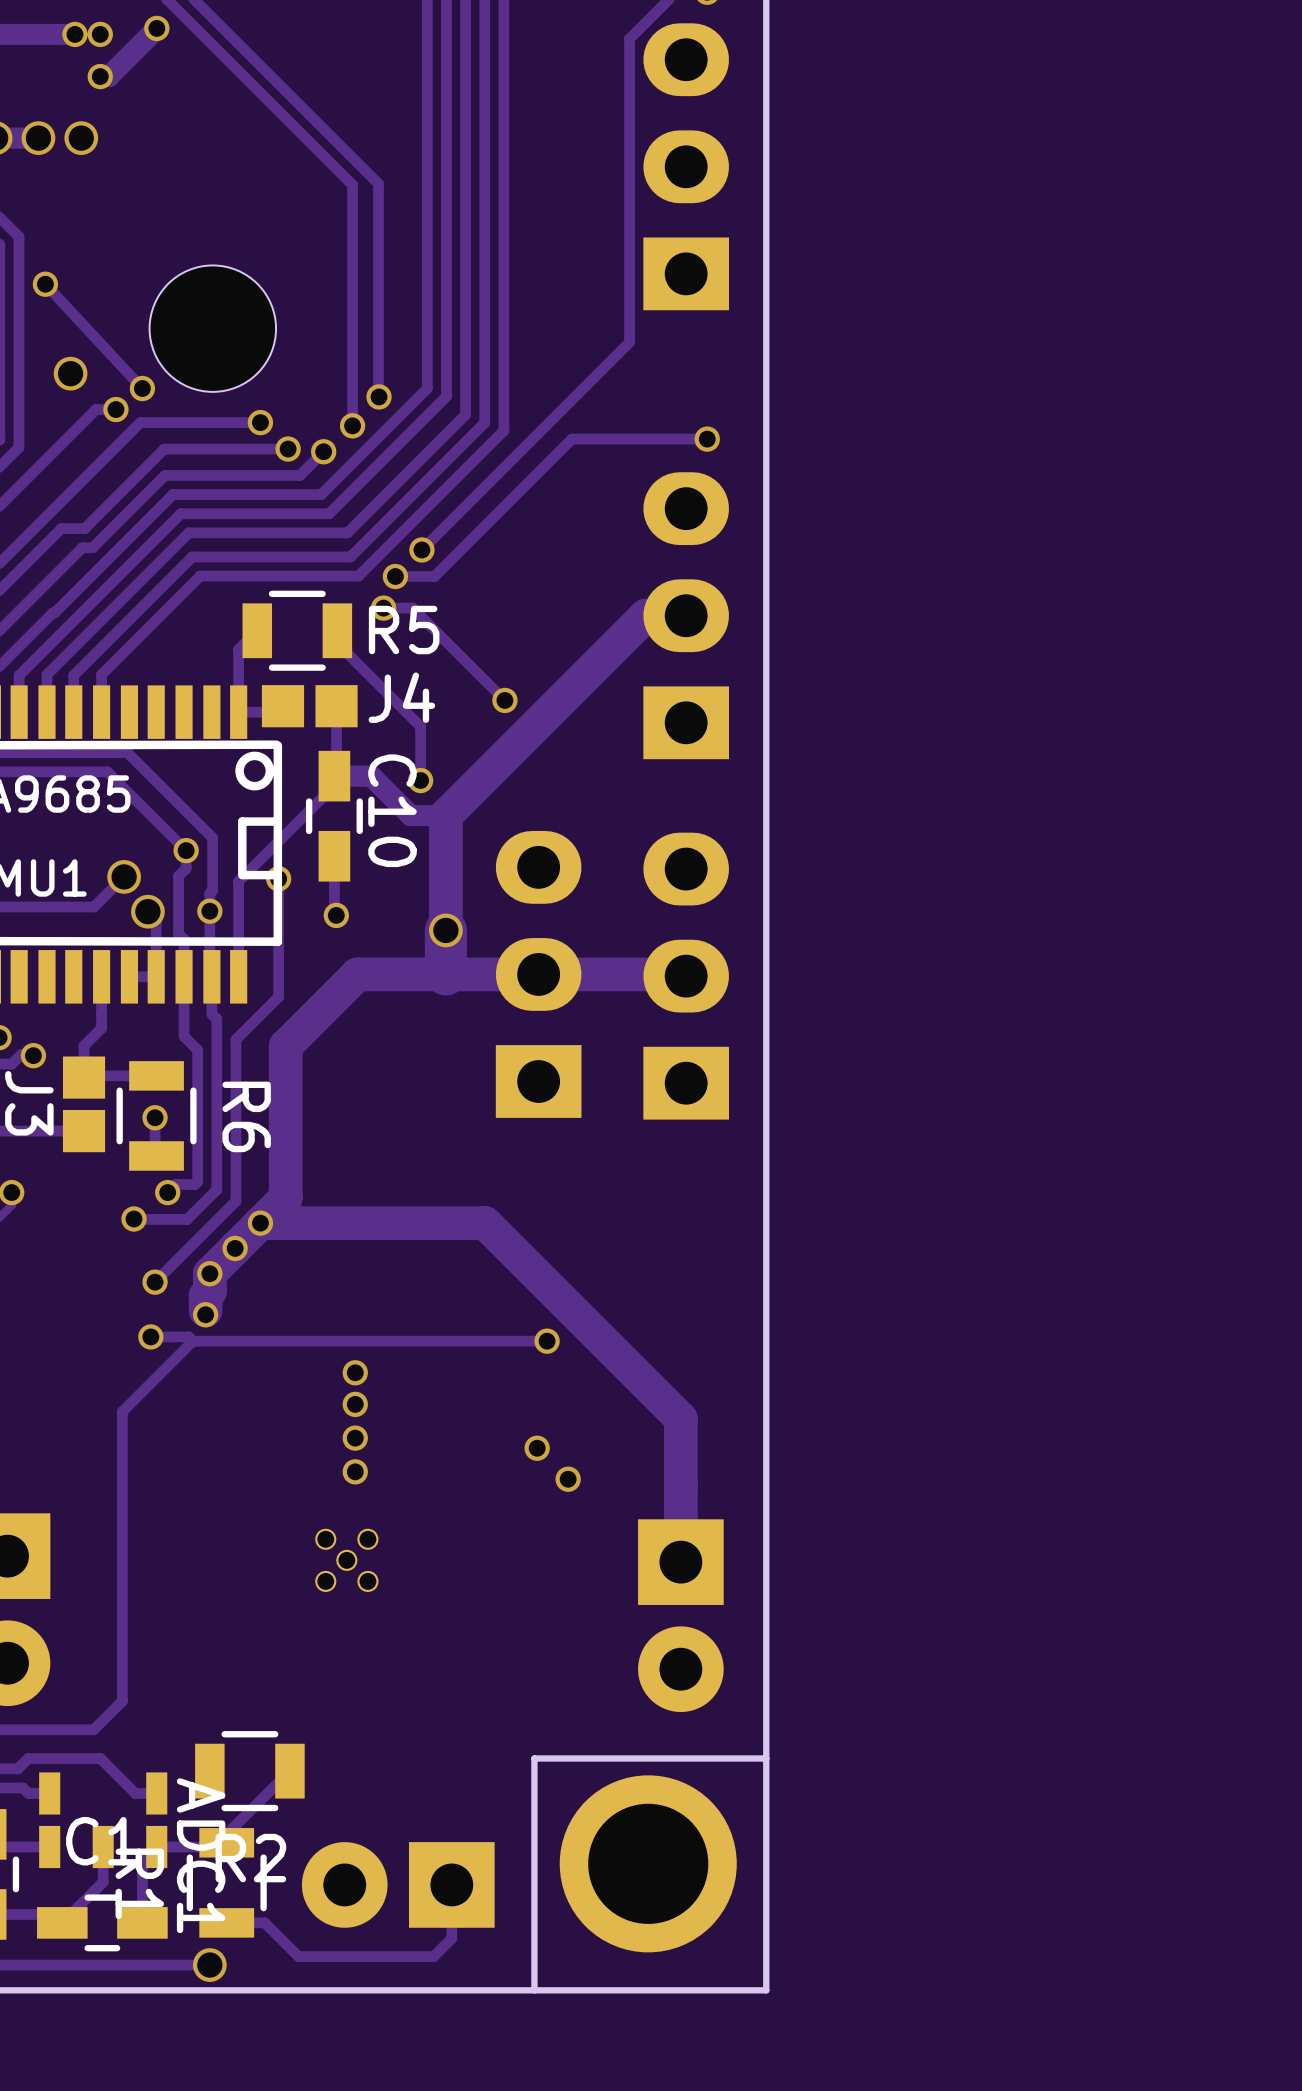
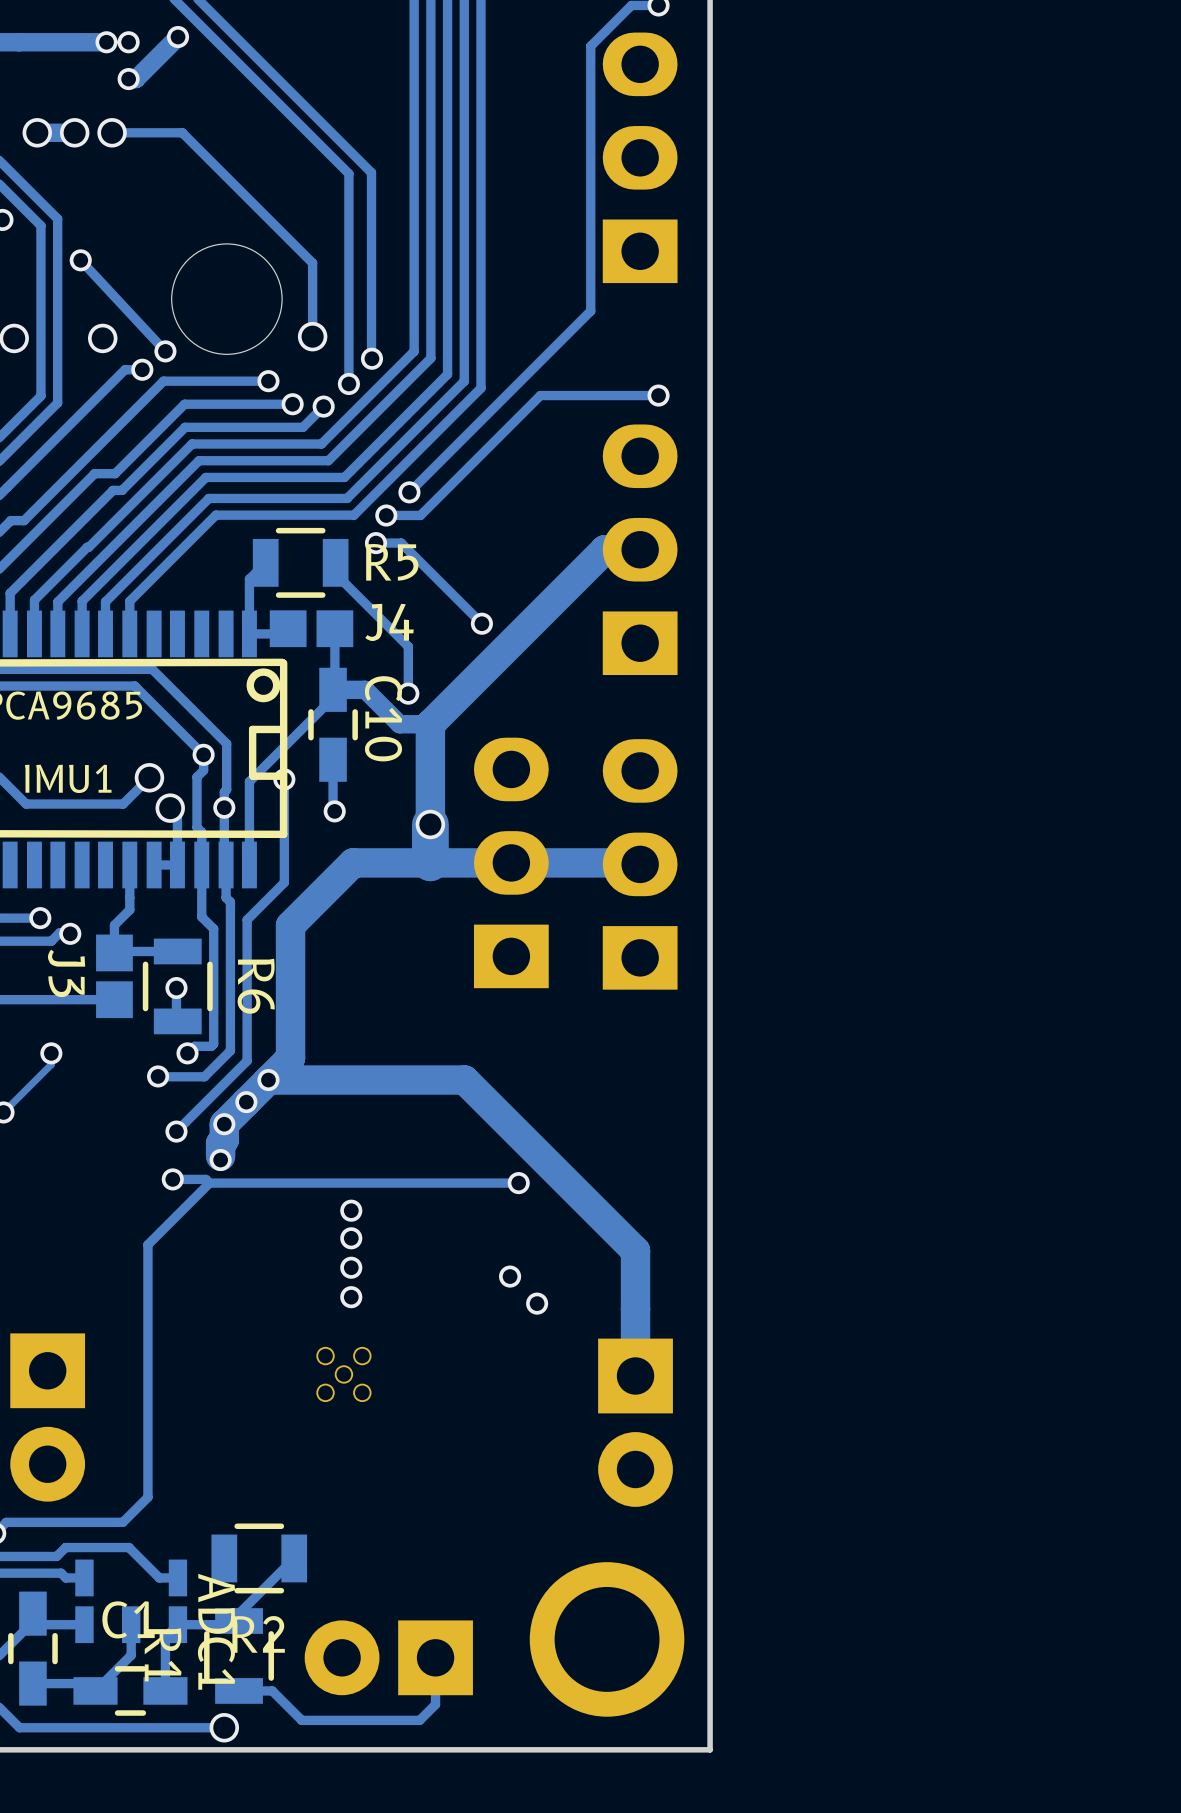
track: none -> (112, 132) (182, 132) (312, 263) (312, 336)
via: none -> (312, 336)
board edge: (766, 1758) (534, 1758) (534, 1990) -> none

